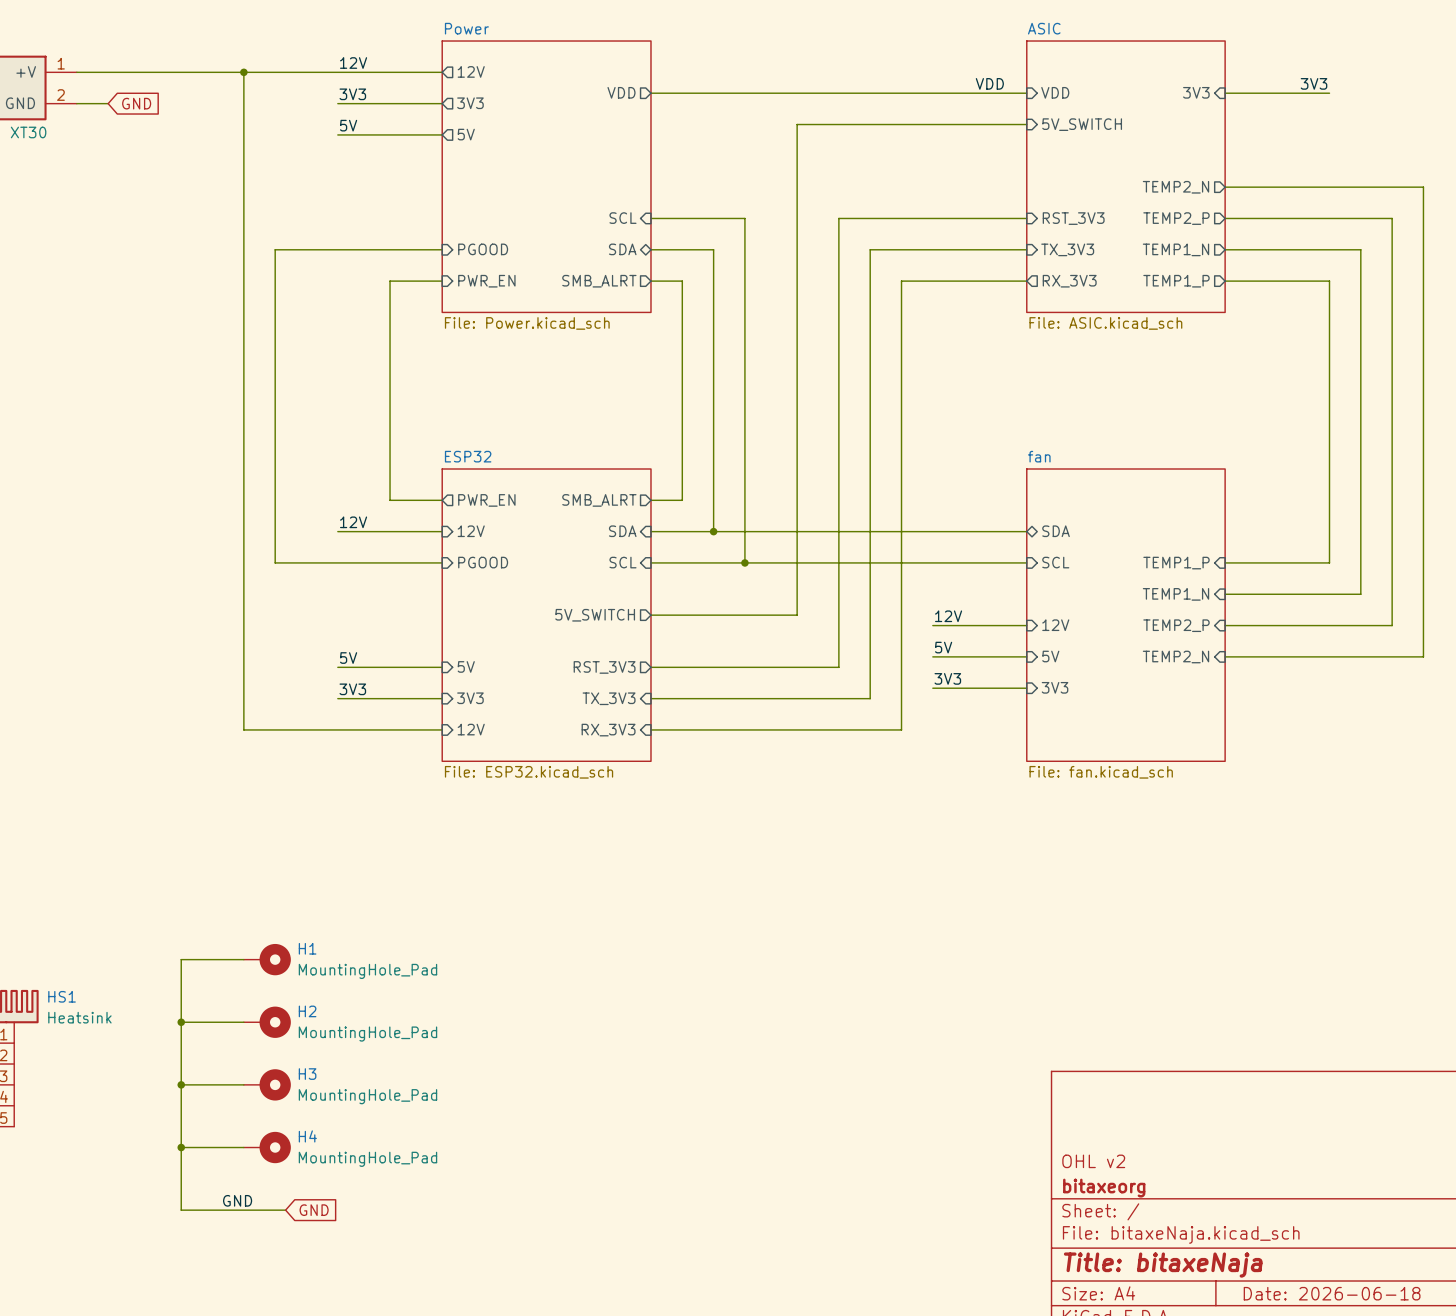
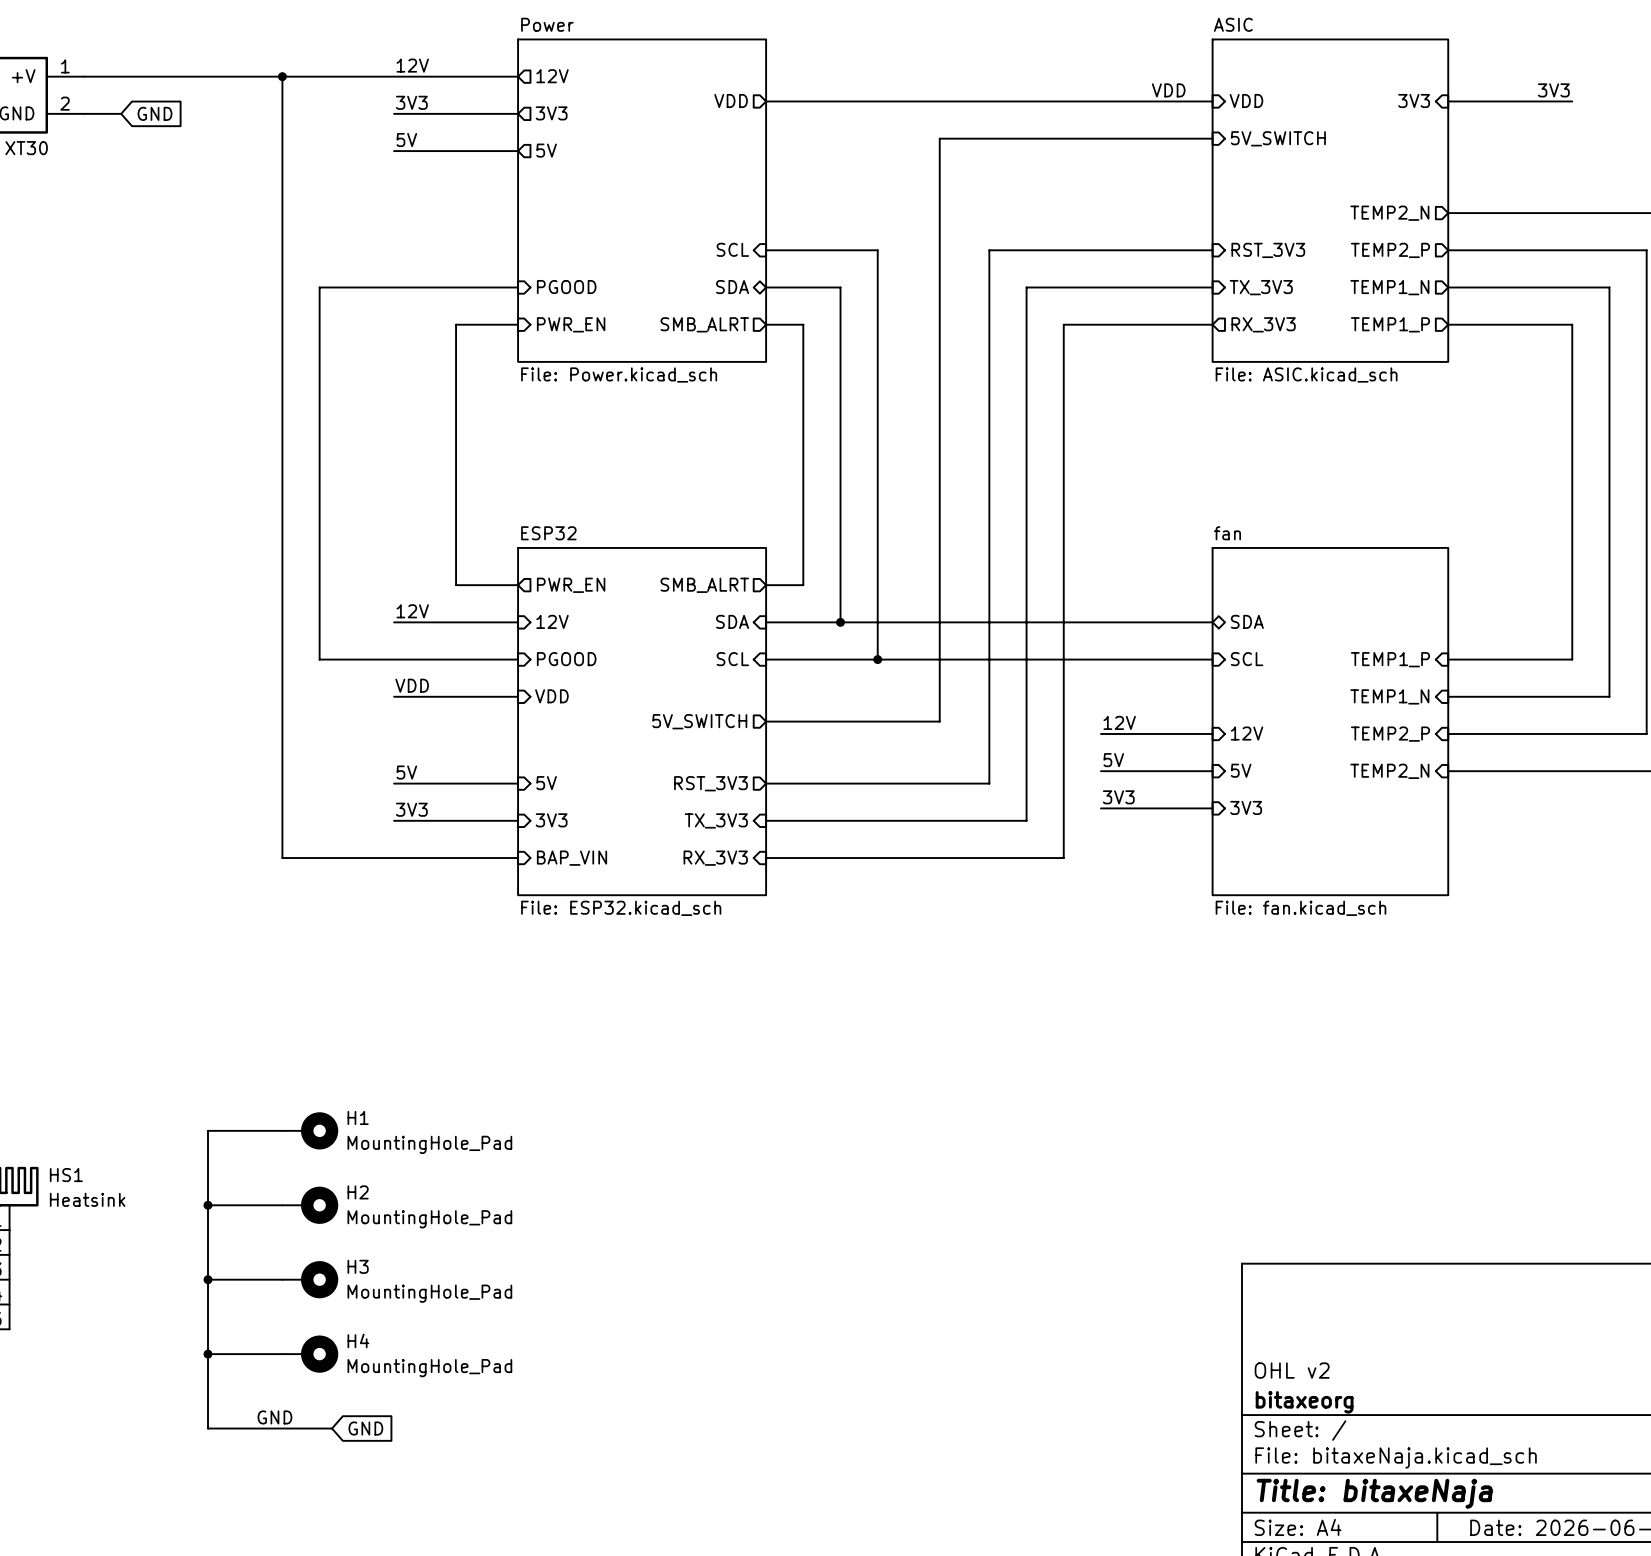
label: none -> VDD (412, 685)
sheet pin: none -> VDD (551, 696)
wire: none -> (394, 696) (518, 696)
sheet pin: 12V (471, 729) -> BAP_VIN (572, 858)

